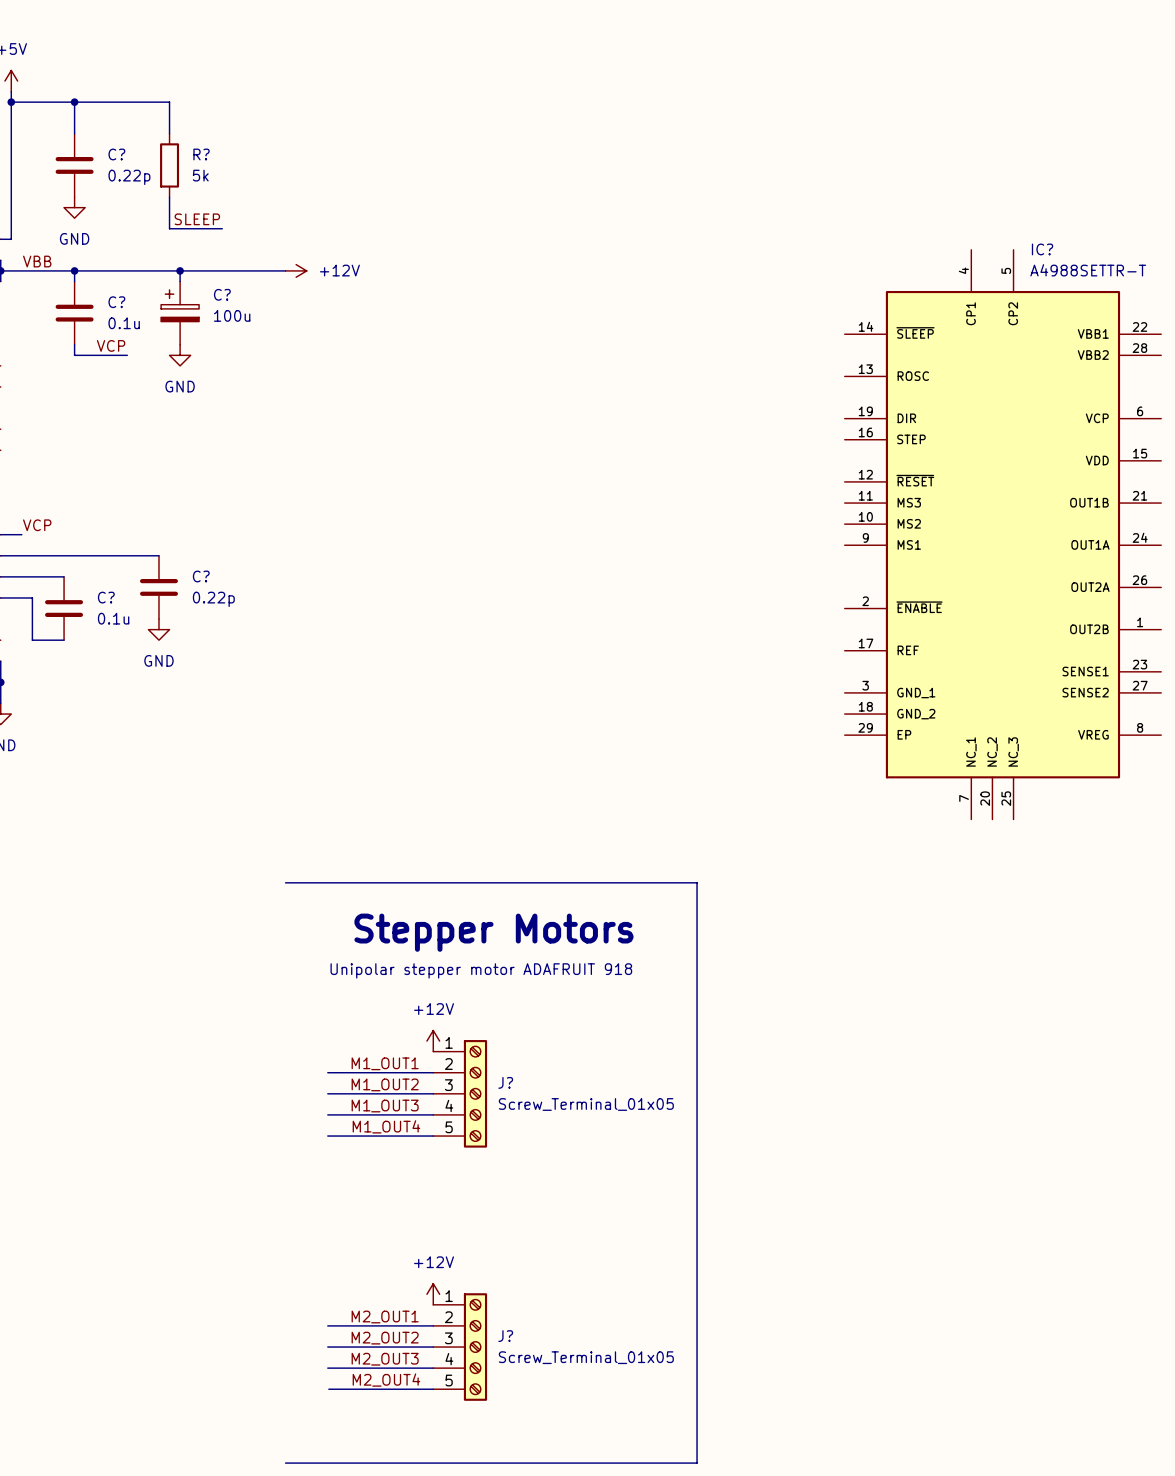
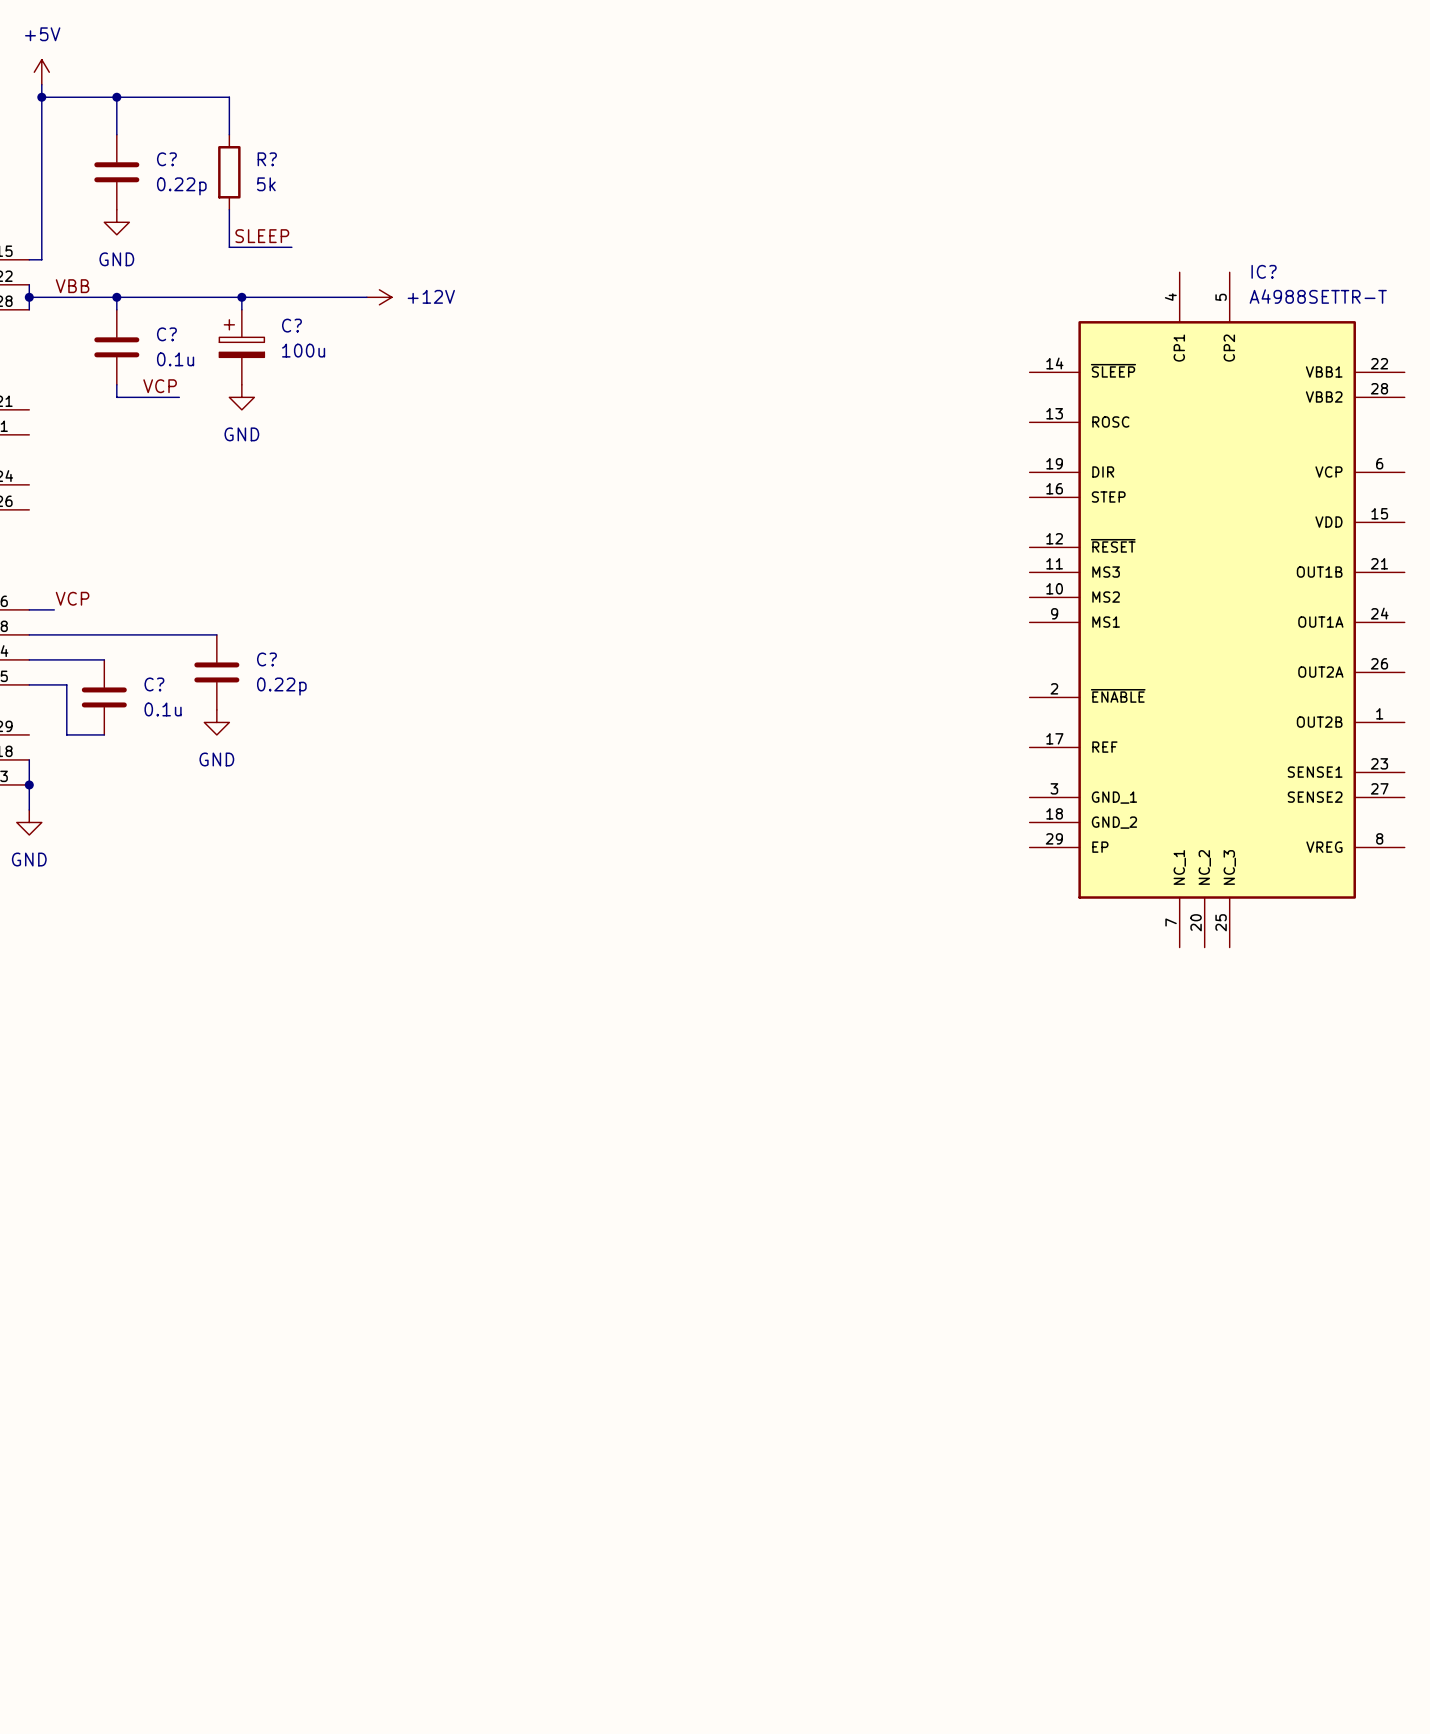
line: (285, 882) (697, 882) (697, 1463) (285, 1463) -> none
text: Stepper Motors (493, 932) -> none
text: Unipolar stepper motor ADAFRUIT 918 (481, 970) -> none
power symbol: +12V (433, 1041) -> none
label: M1_OUT1 (385, 1063) -> none
wire: (327, 1072) (433, 1072) -> none
label: M1_OUT2 (385, 1084) -> none
wire: (327, 1093) (433, 1093) -> none
J?: Screw_Terminal_01x05 (460, 1093) -> none
label: M1_OUT3 (385, 1106) -> none
wire: (327, 1114) (433, 1114) -> none
label: M1_OUT4 (386, 1126) -> none
wire: (327, 1136) (433, 1136) -> none
power symbol: +12V (433, 1294) -> none
label: M2_OUT1 (385, 1317) -> none
wire: (327, 1325) (433, 1325) -> none
label: M2_OUT2 (385, 1338) -> none
wire: (327, 1347) (433, 1347) -> none
J?: Screw_Terminal_01x05 (460, 1347) -> none
label: M2_OUT3 (385, 1359) -> none
wire: (327, 1368) (433, 1368) -> none
label: M2_OUT4 (386, 1380) -> none
wire: (328, 1389) (433, 1389) -> none

